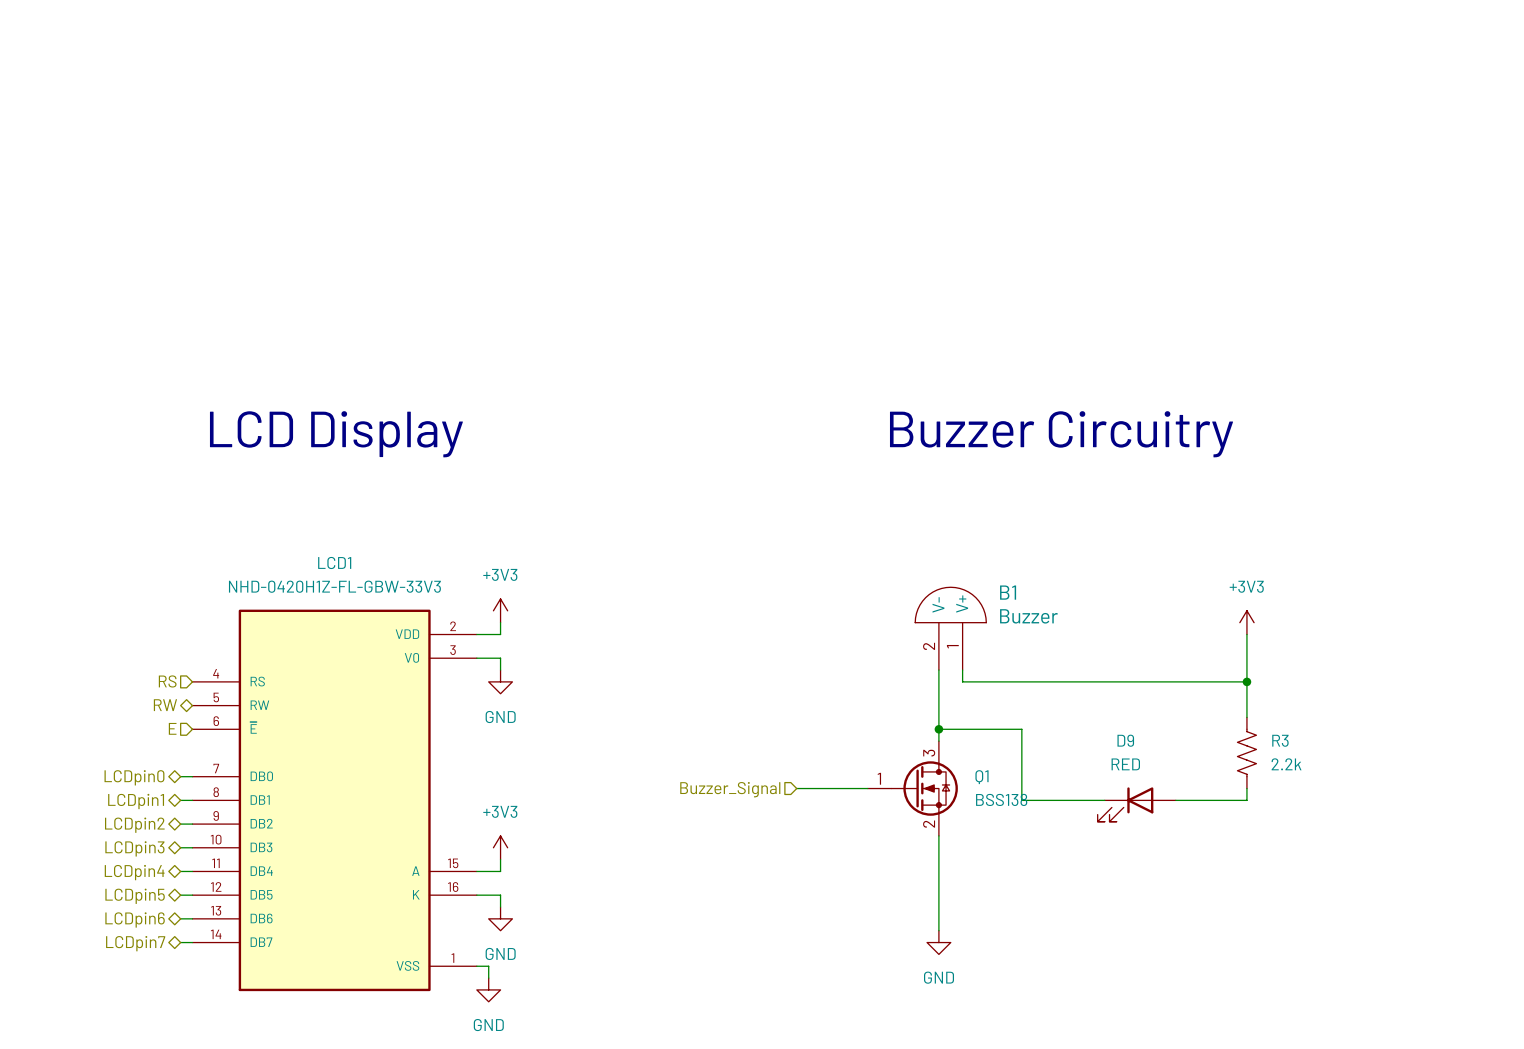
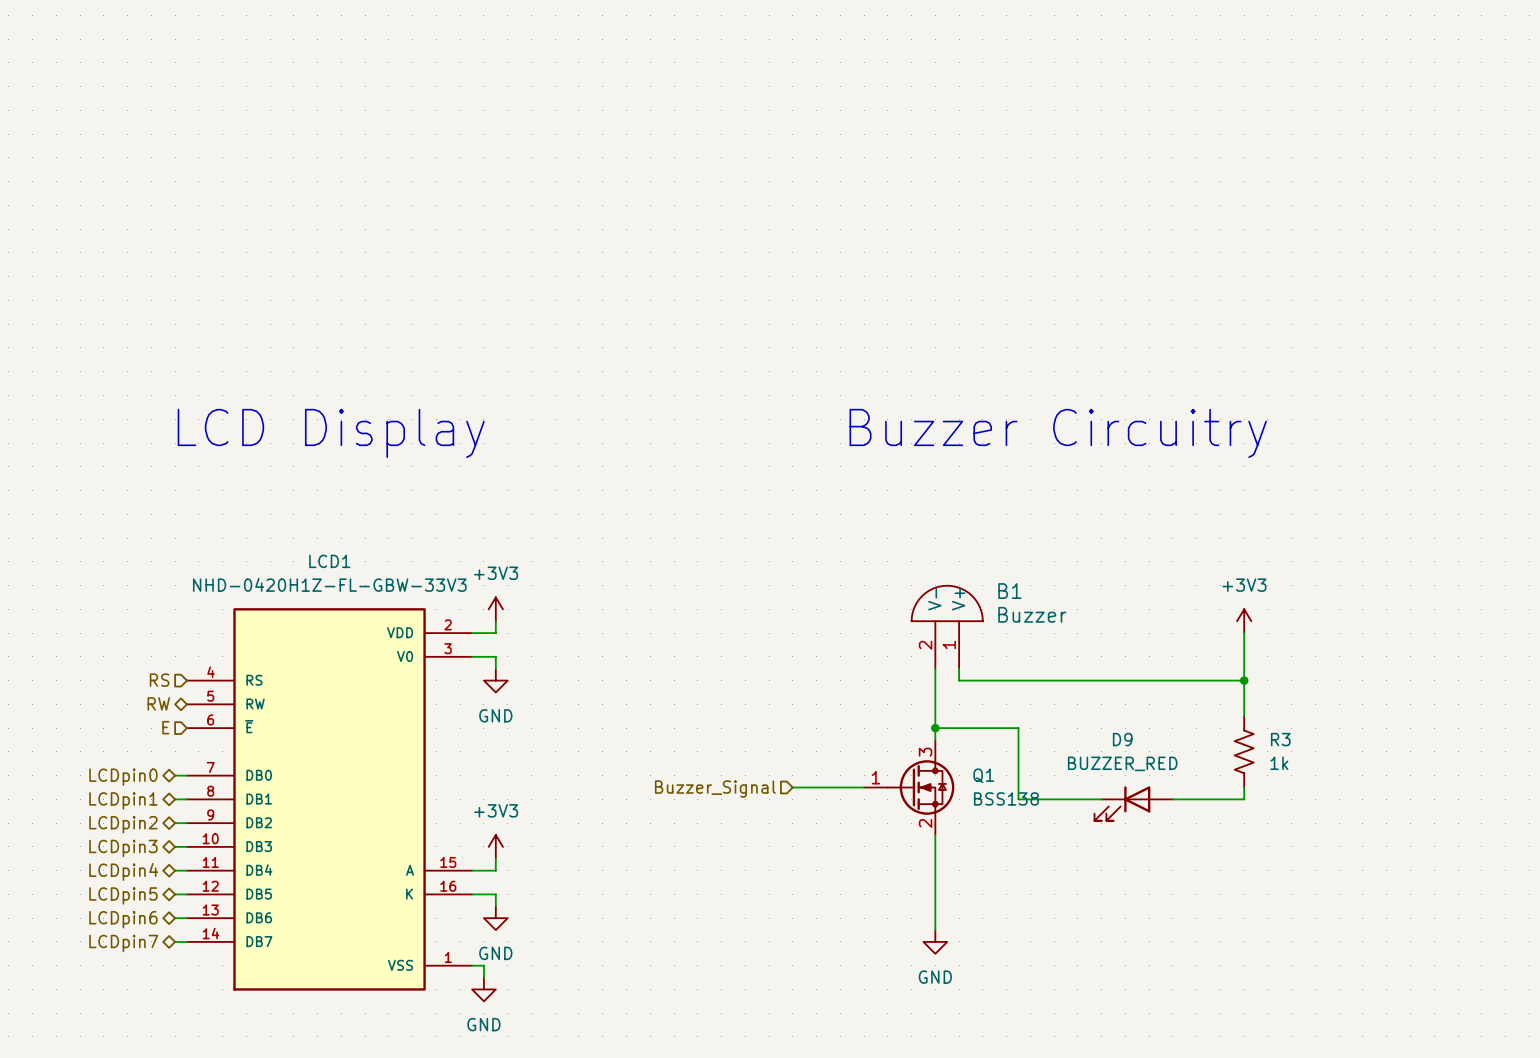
D9 value: RED (1125, 764) -> BUZZER_RED (1122, 763)
R3 value: 2.2k (1286, 764) -> 1k (1279, 763)

